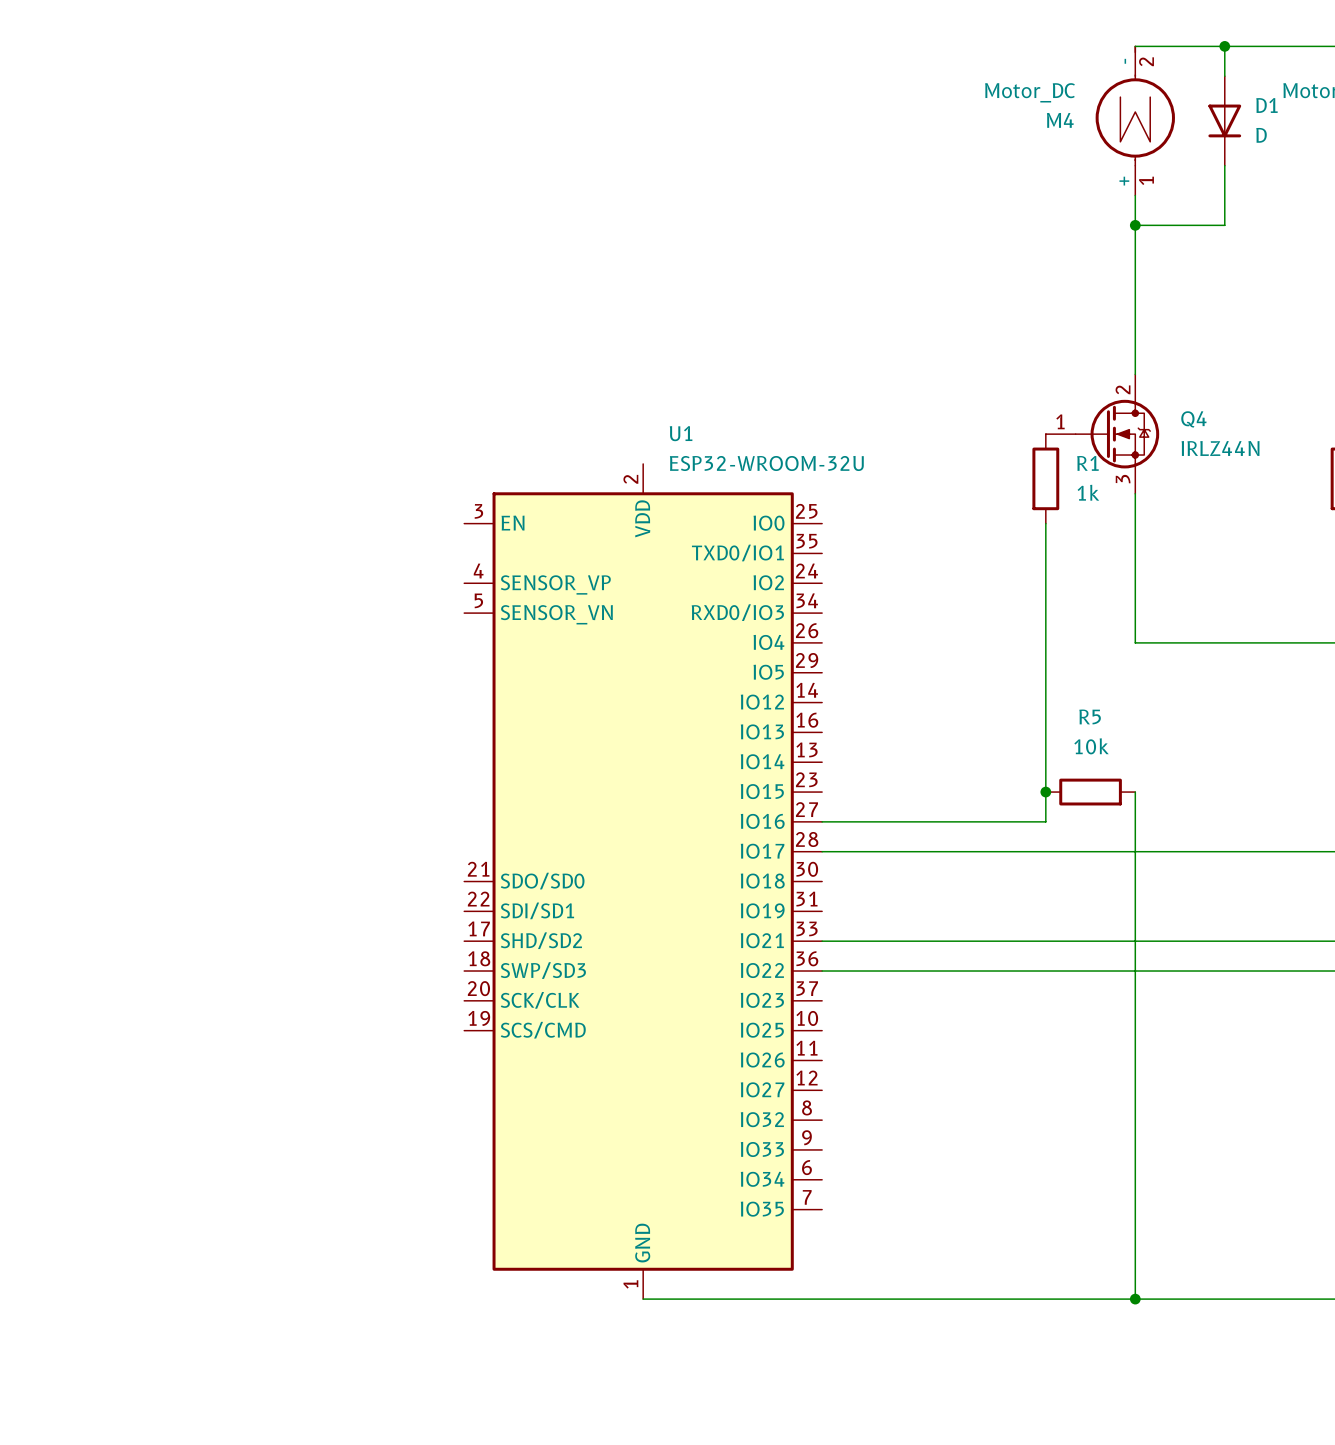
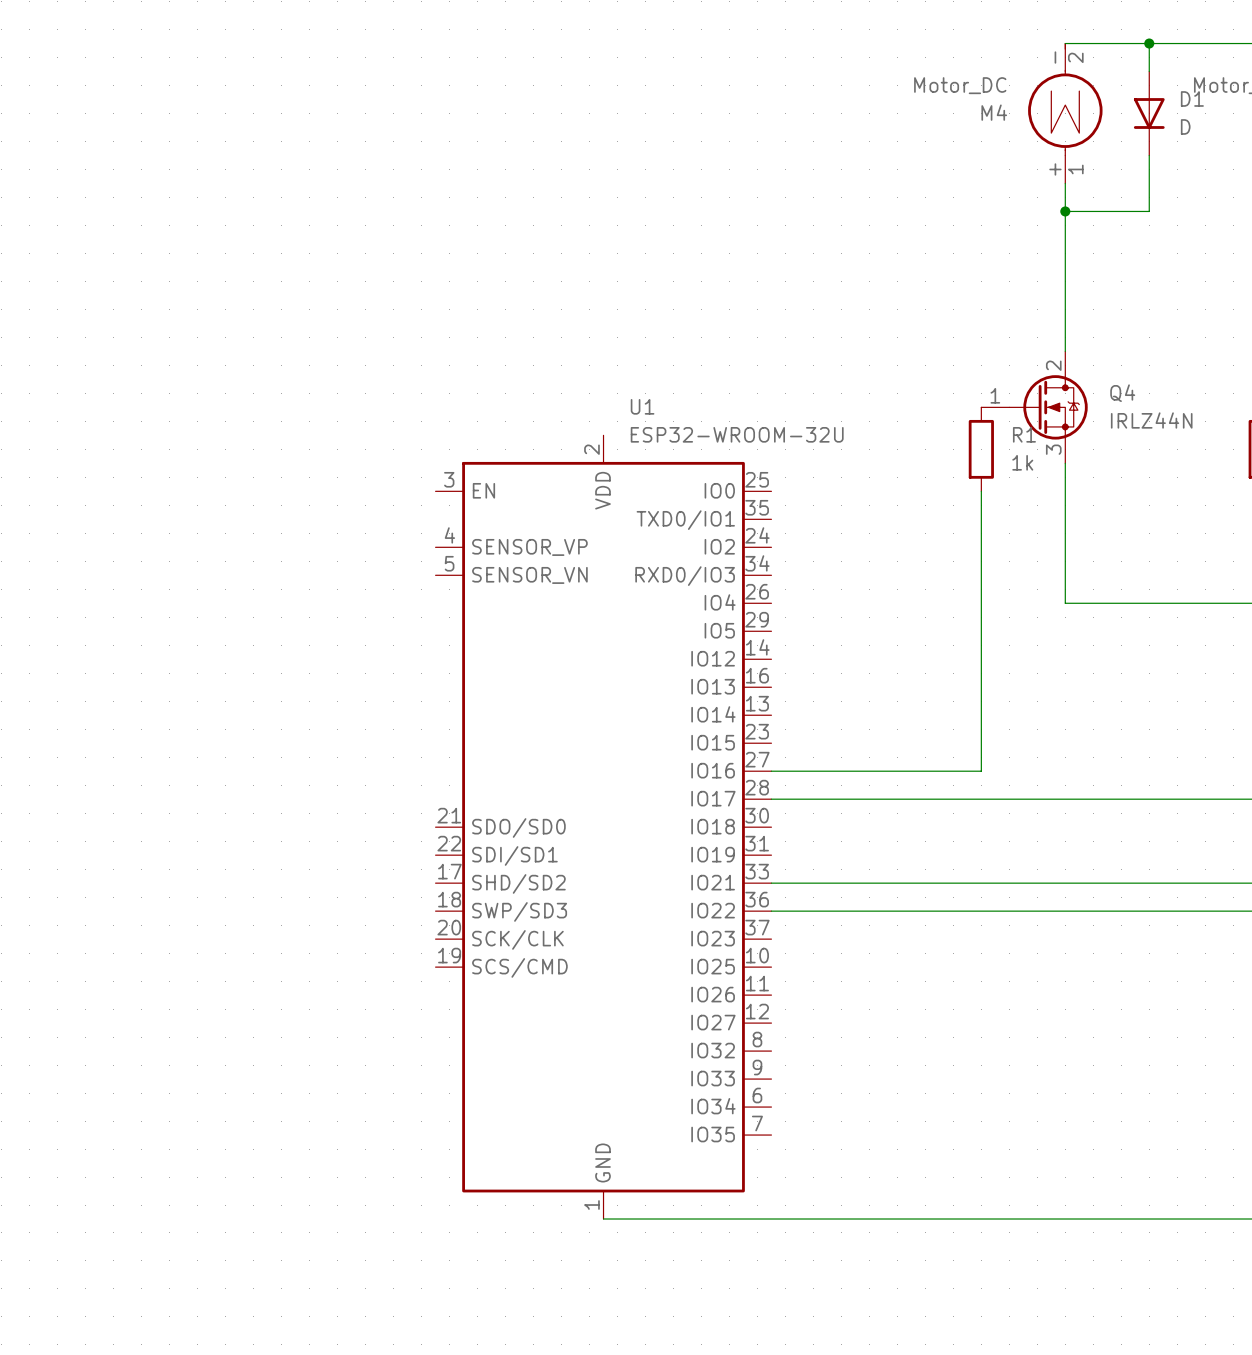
junction: (1045, 792) -> none
R5: 10k (1090, 792) -> none
wire: (1135, 792) (1135, 1299) -> none
junction: (1135, 1299) -> none

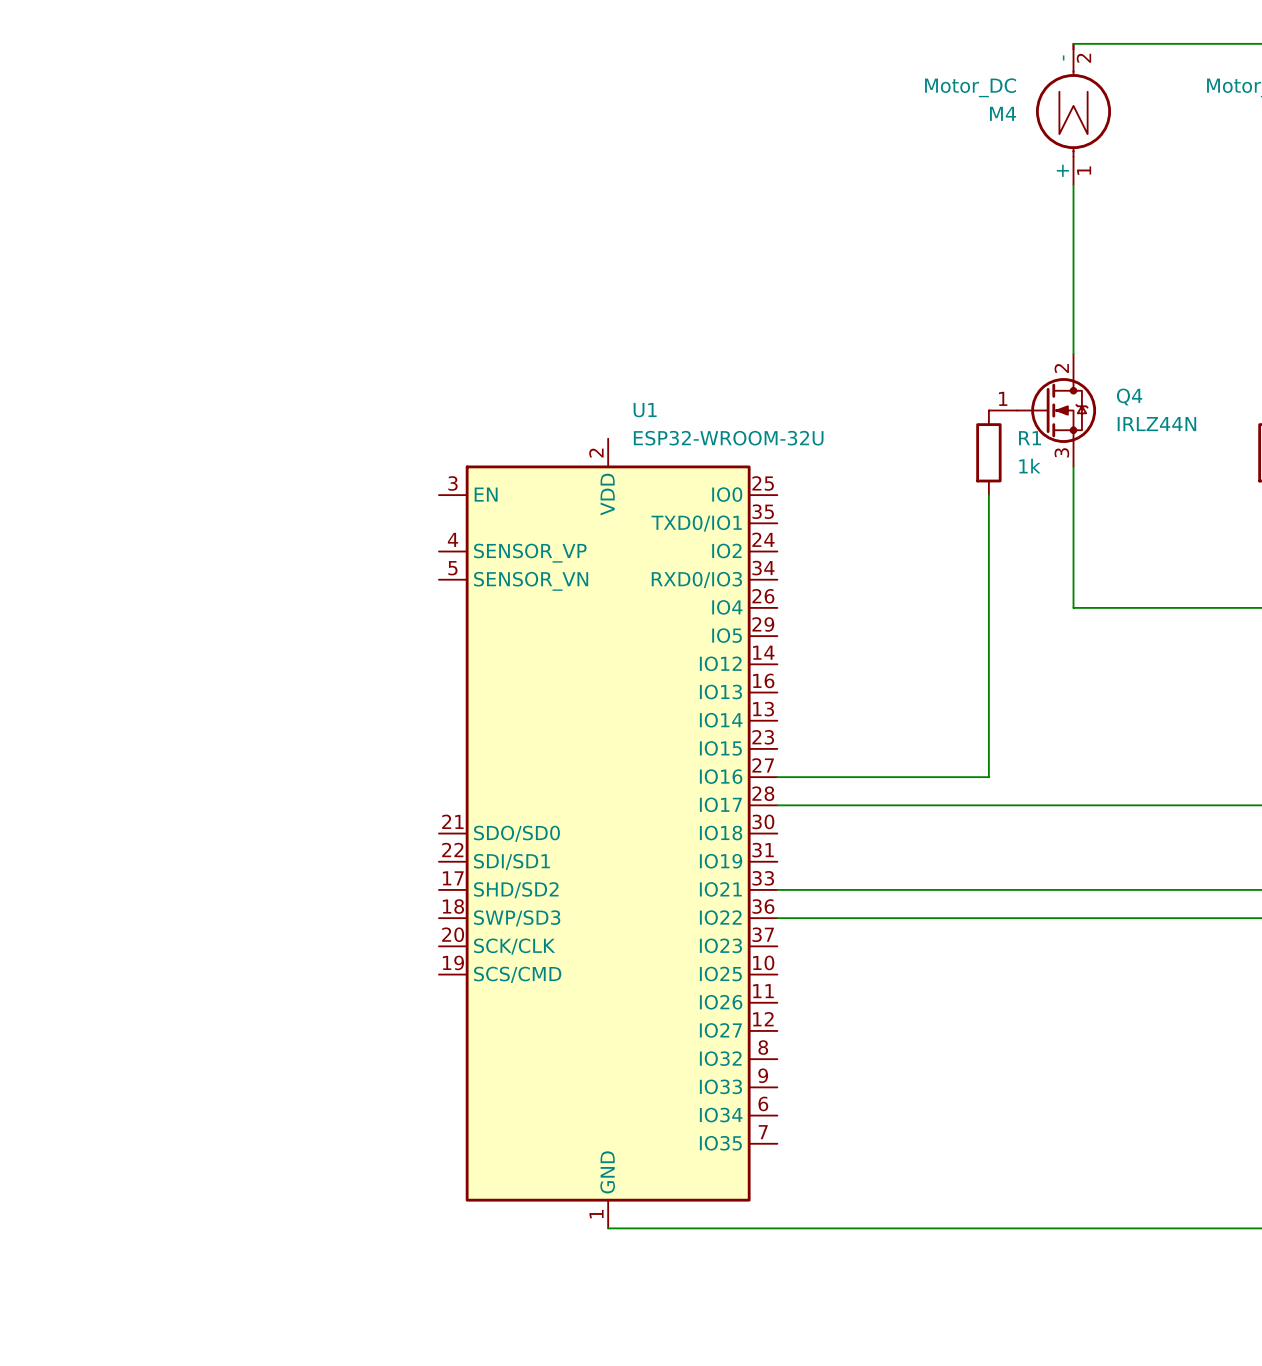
wire: (1149, 43) (1149, 71) -> none
junction: (1149, 43) -> none
D1: D (1149, 113) -> none
wire: (1149, 155) (1149, 211) (1065, 211) -> none
junction: (1065, 211) -> none

